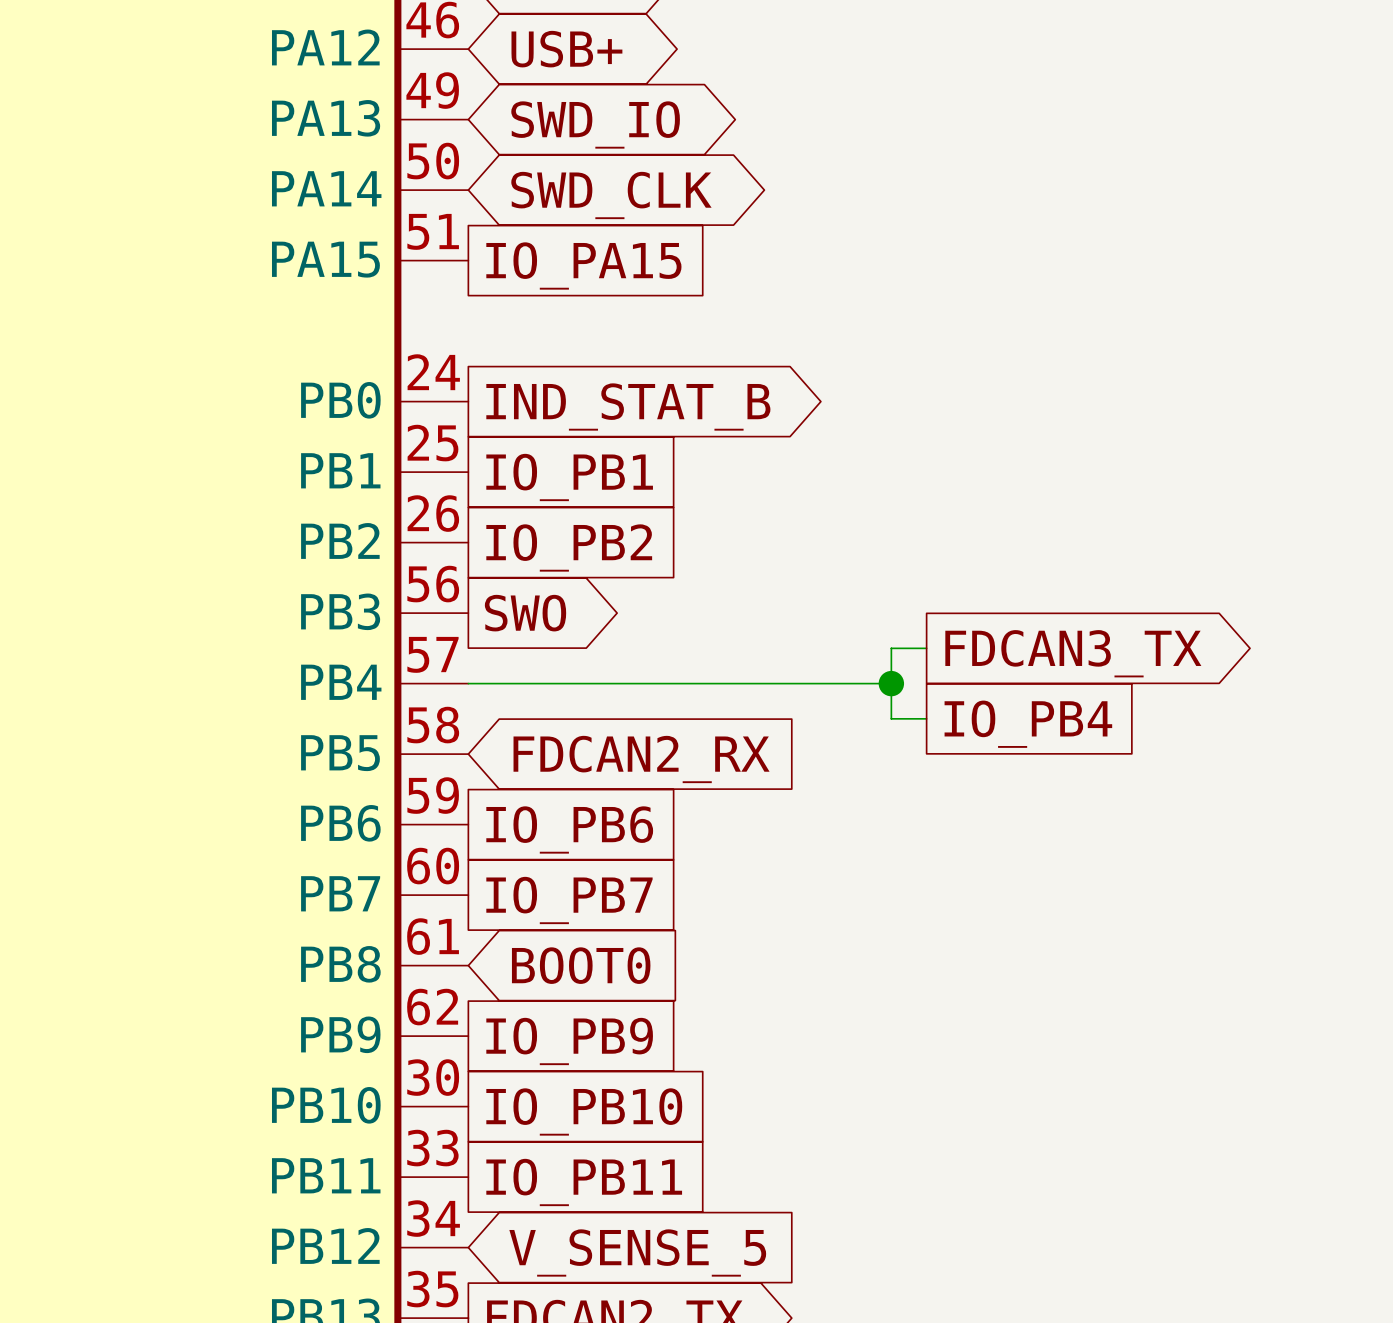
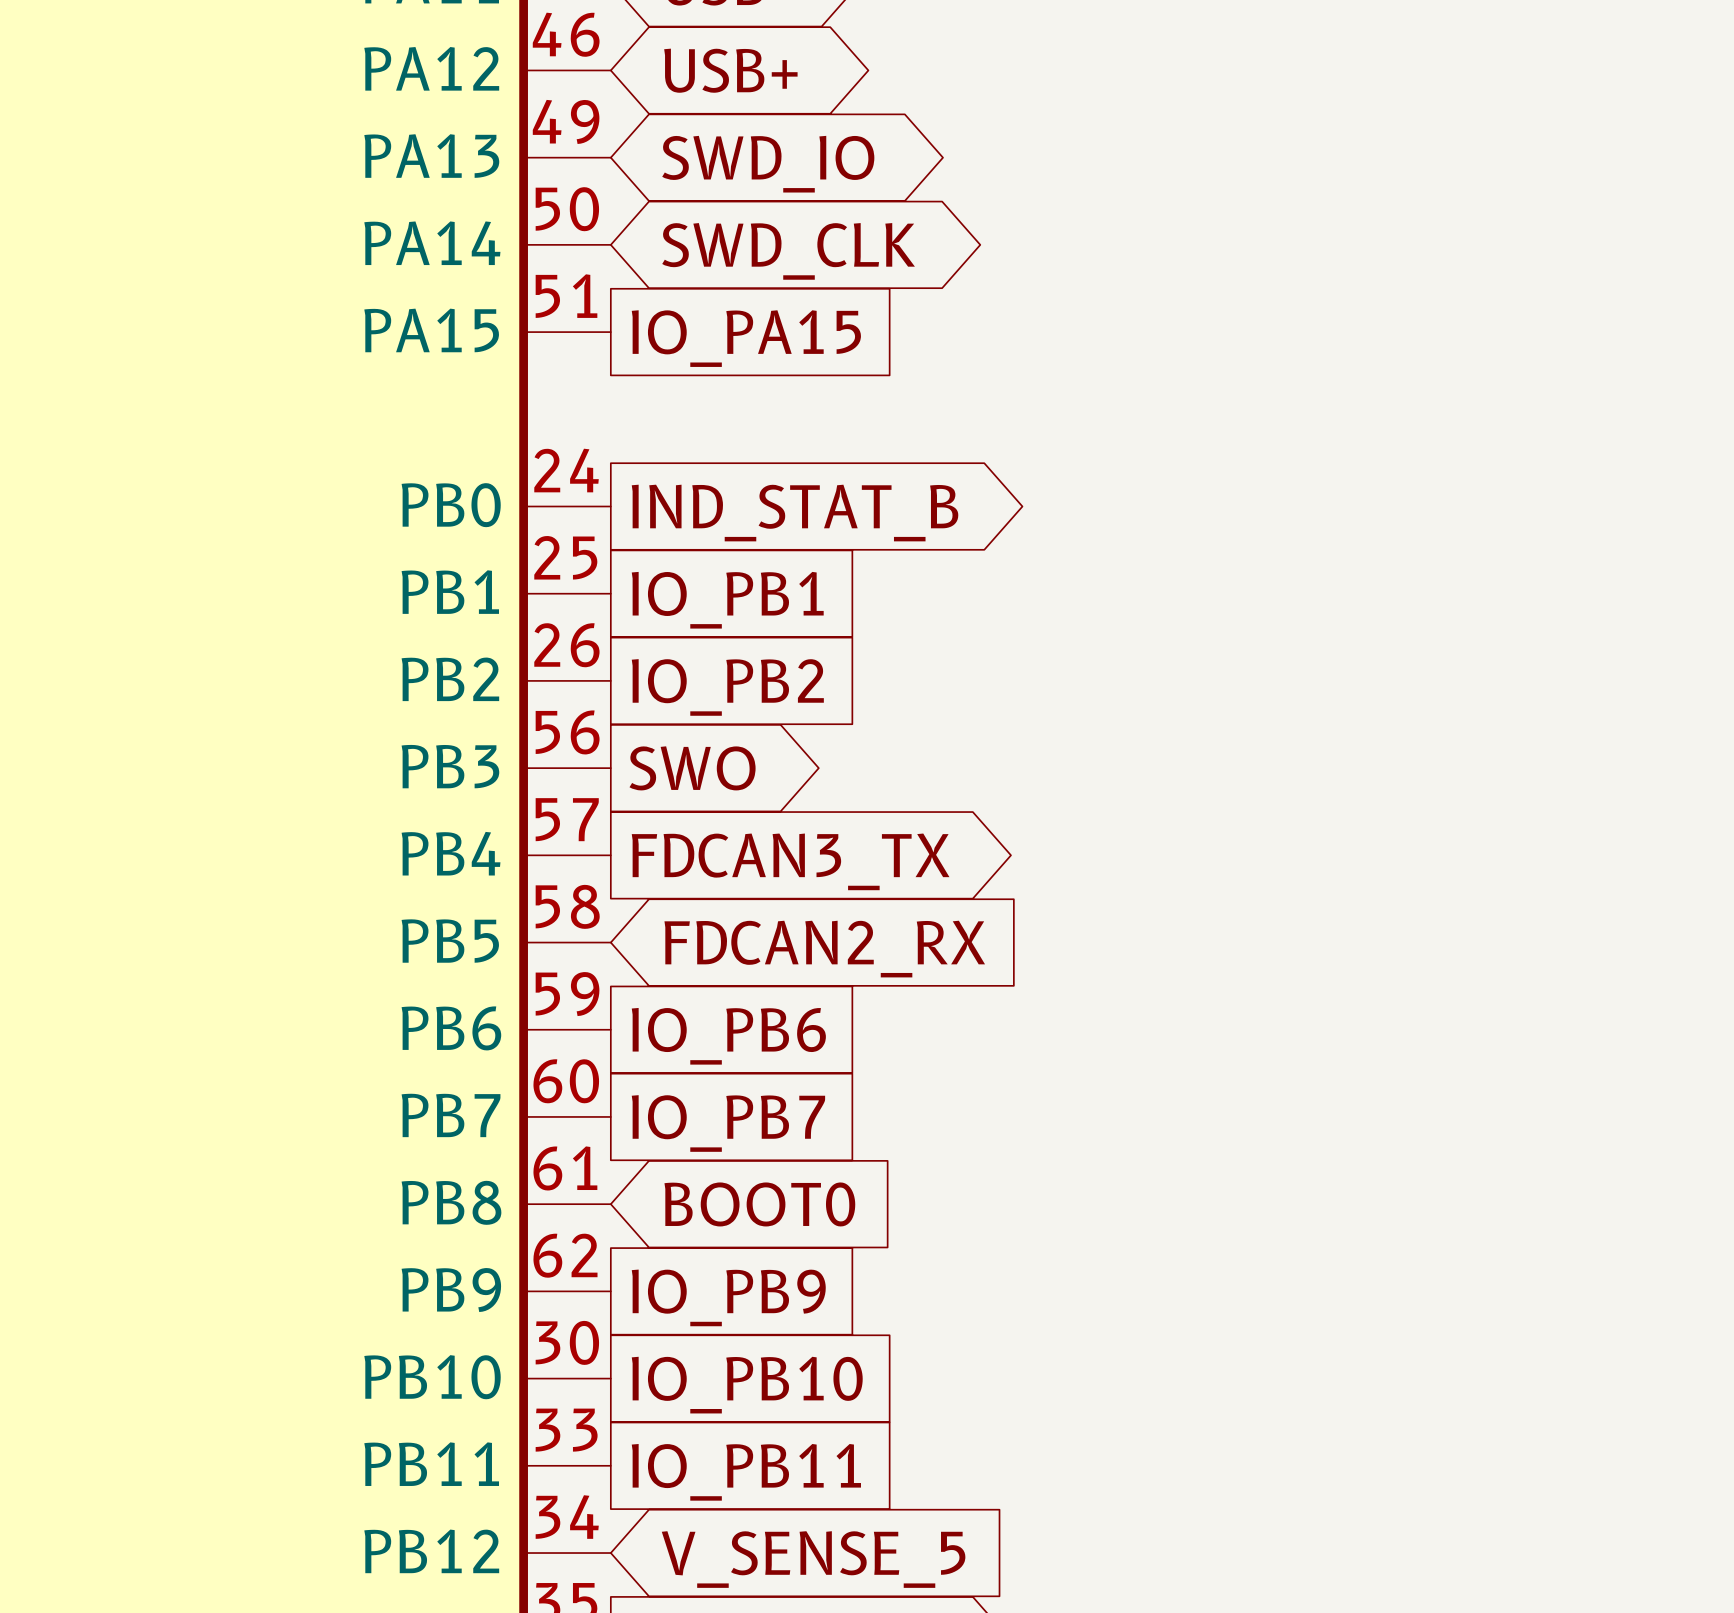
wire: (926, 648) (891, 648) (891, 718) (926, 718) -> none
global label position: FDCAN3_TX (1073, 653) -> FDCAN3_TX (790, 861)
wire: (468, 683) (891, 683) -> none
junction: (891, 683) -> none
global label: IO_PB4 (1028, 724) -> none

